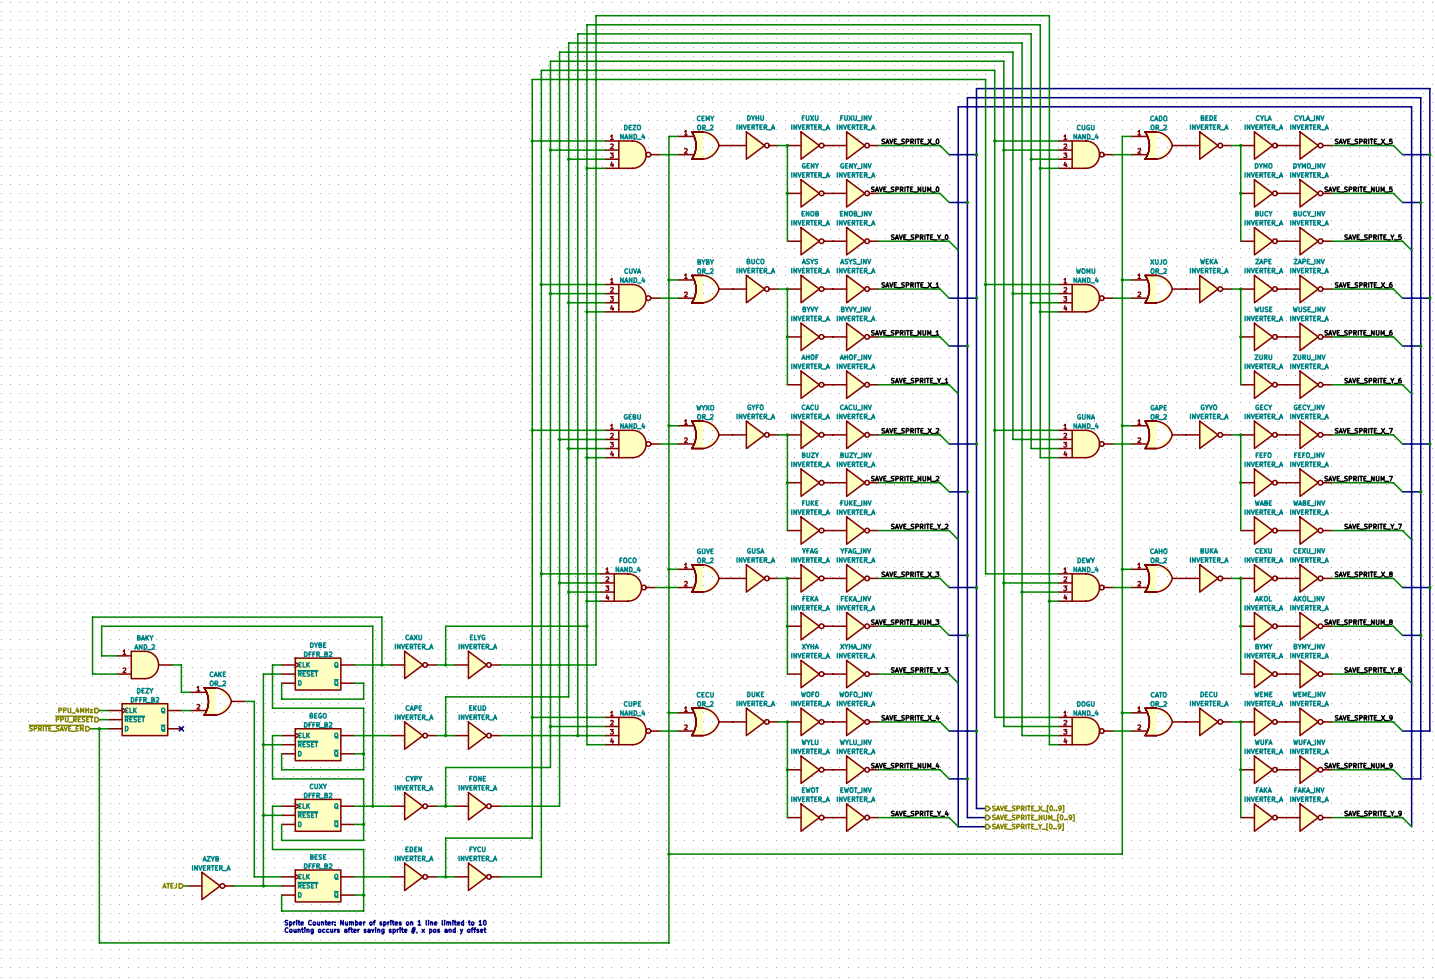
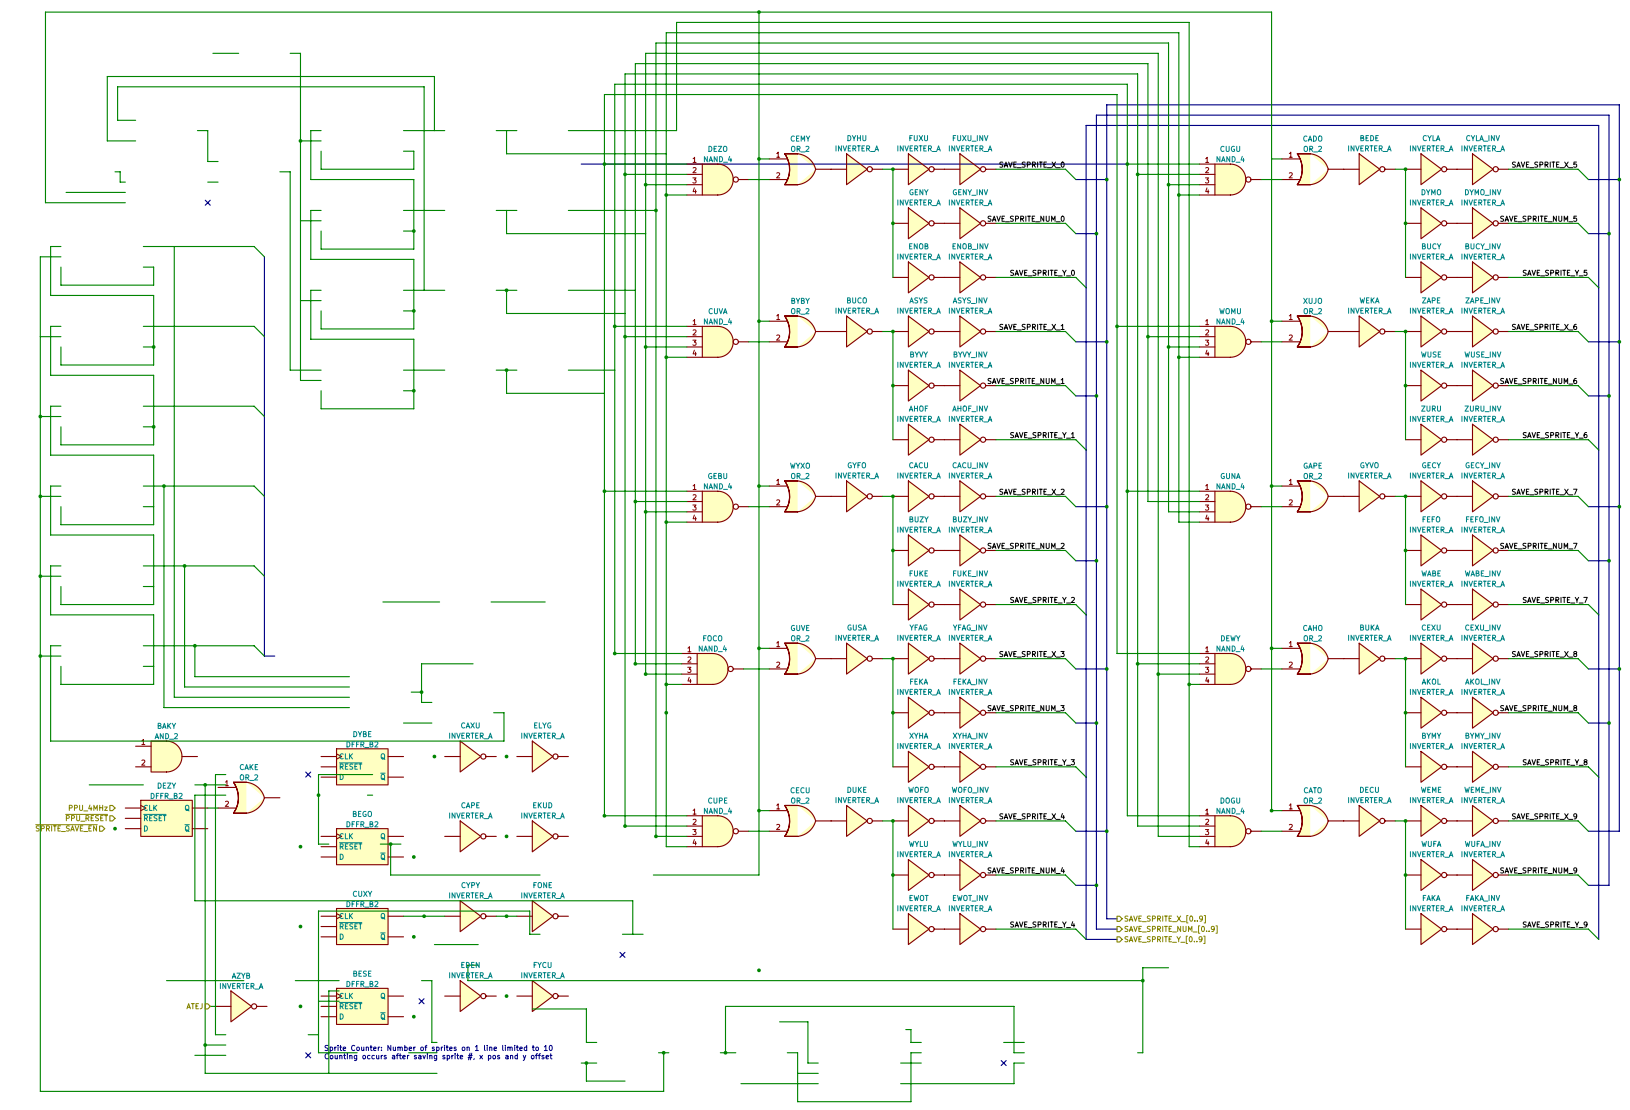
wire: none -> (758, 12) (758, 158)
junction: none -> (758, 12)
wire: none -> (212, 53) (238, 53)
wire: none -> (290, 53) (300, 53) (300, 380) (321, 380)
wire: none -> (135, 120) (117, 120) (117, 86) (424, 86) (424, 290)
wire: none -> (197, 130) (207, 130) (207, 161) (218, 161)
wire: none -> (321, 130) (310, 130) (310, 179) (413, 179) (413, 249) (321, 249) (321, 231)
wire: none -> (403, 130) (444, 130)
wire: none -> (434, 130) (434, 76) (107, 76) (107, 140) (135, 140)
wire: none -> (496, 130) (516, 130)
wire: none -> (506, 130) (506, 153) (666, 153)
wire: (596, 111) (596, 664) (500, 664) -> (676, 130) (568, 130)
wire: none -> (300, 140) (321, 140)
junction: none -> (300, 140)
wire: none -> (321, 151) (321, 169) (413, 169) (413, 151) (403, 151)
junction: none -> (758, 158)
wire: none -> (1271, 158) (1271, 12) (45, 12) (45, 202) (125, 202)
line: none -> (581, 164) (1127, 164)
wire: none -> (115, 171) (120, 171) (120, 182) (125, 182)
wire: none -> (279, 171) (290, 171) (290, 370) (321, 370)
wire: none -> (207, 182) (218, 182)
wire: none -> (66, 192) (125, 192)
no-connect mark: none -> (207, 202)
wire: none -> (321, 210) (310, 210) (310, 259) (413, 259) (413, 328) (321, 328) (321, 310)
wire: none -> (403, 210) (444, 210)
wire: none -> (496, 210) (516, 210)
wire: none -> (506, 210) (506, 233) (645, 233)
wire: none -> (568, 210) (655, 210)
junction: none -> (655, 210)
wire: none -> (300, 220) (321, 220)
wire: none -> (403, 231) (413, 231)
junction: none -> (413, 231)
wire: none -> (60, 246) (50, 246) (50, 295) (153, 295) (153, 365) (60, 365) (60, 346)
wire: none -> (143, 246) (254, 246) (264, 256)
wire: none -> (174, 246) (174, 697) (349, 697)
wire: none -> (60, 256) (40, 256) (40, 1091) (663, 1091) (663, 1052)
bus: none -> (264, 256) (264, 656) (274, 656)
wire: none -> (60, 267) (60, 285) (153, 285) (153, 267) (143, 267)
wire: none -> (321, 290) (310, 290) (310, 339) (413, 339) (413, 408) (321, 408) (321, 390)
wire: none -> (403, 290) (444, 290)
wire: none -> (496, 290) (516, 290)
wire: none -> (506, 290) (506, 313) (625, 313)
junction: none -> (506, 290)
wire: none -> (568, 290) (635, 290)
wire: none -> (300, 300) (321, 300)
wire: none -> (403, 310) (413, 310)
junction: none -> (413, 310)
wire: none -> (60, 326) (50, 326) (50, 375) (153, 375) (153, 444) (60, 444) (60, 426)
wire: none -> (143, 326) (254, 326) (264, 336)
wire: none -> (40, 336) (60, 336)
wire: none -> (143, 346) (153, 346)
junction: none -> (153, 346)
wire: none -> (403, 370) (444, 370)
wire: none -> (496, 370) (516, 370)
wire: none -> (506, 370) (506, 393) (604, 393)
junction: none -> (506, 370)
wire: none -> (568, 370) (614, 370)
wire: none -> (403, 390) (413, 390)
junction: none -> (413, 390)
wire: none -> (60, 406) (50, 406) (50, 455) (153, 455) (153, 524) (60, 524) (60, 506)
wire: none -> (143, 406) (254, 406) (264, 416)
wire: none -> (40, 416) (60, 416)
junction: none -> (40, 416)
wire: none -> (143, 426) (153, 426)
junction: none -> (153, 426)
wire: none -> (60, 486) (50, 486) (50, 535) (153, 535) (153, 604) (60, 604) (60, 586)
wire: none -> (143, 486) (254, 486) (264, 496)
wire: none -> (163, 486) (163, 707) (349, 707)
junction: none -> (163, 486)
wire: none -> (40, 496) (60, 496)
junction: none -> (40, 496)
wire: none -> (143, 506) (153, 506)
wire: none -> (60, 565) (50, 565) (50, 614) (153, 614) (153, 684) (60, 684) (60, 666)
wire: none -> (143, 565) (254, 565) (264, 576)
wire: none -> (184, 565) (184, 686) (349, 686)
junction: none -> (184, 565)
wire: none -> (40, 576) (60, 576)
junction: none -> (40, 576)
wire: none -> (143, 586) (153, 586)
wire: none -> (382, 601) (439, 601)
wire: none -> (491, 601) (545, 601)
wire: none -> (60, 645) (50, 645) (50, 741) (503, 741) (503, 712) (493, 712)
wire: none -> (143, 645) (254, 645) (264, 656)
wire: none -> (194, 645) (194, 676) (349, 676)
junction: none -> (194, 645)
wire: (541, 573) (541, 876) (500, 876) -> none
wire: none -> (40, 656) (60, 656)
junction: none -> (40, 656)
wire: (559, 582) (559, 806) (500, 806) -> none
wire: none -> (143, 666) (153, 666)
wire: (568, 592) (568, 696) (445, 696) (445, 735) -> none
wire: none -> (411, 692) (421, 692)
junction: none -> (421, 692)
wire: (370, 617) (92, 617) (92, 674) (117, 674) -> (421, 702) (421, 663) (473, 663)
wire: (379, 617) (381, 617) (381, 664) -> none
wire: (586, 626) (445, 626) (445, 664) -> none
wire: none -> (403, 723) (431, 723)
wire: (117, 655) (101, 655) (101, 626) (372, 626) (372, 806) -> none
wire: (172, 664) (181, 664) (181, 692) (190, 692) -> none
wire: (281, 664) (272, 664) (272, 708) (363, 708) (363, 769) -> (540, 875) (413, 875)
wire: (354, 664) (390, 664) -> none
wire: (436, 664) (454, 664) -> none
wire: (281, 674) (263, 674) (263, 885) -> none
wire: none -> (225, 774) (215, 774) (215, 1034) (225, 1034)
no-connect mark: none -> (308, 774)
wire: none -> (372, 774) (318, 774) (318, 844) (328, 844)
wire: (281, 683) (281, 699) (322, 699) -> none
wire: (354, 683) (363, 683) (363, 699) (327, 699) -> none
wire: none -> (89, 784) (143, 784)
wire: none -> (194, 784) (225, 784)
wire: none -> (205, 784) (205, 1073) (437, 1073)
junction: none -> (205, 784)
wire: none -> (225, 795) (194, 795) (194, 900) (632, 900) (632, 934)
junction: none -> (318, 795)
wire: (245, 701) (254, 701) (254, 876) (281, 876) -> none
wire: (99, 710) (108, 710) -> none
wire: (1122, 712) (1122, 854) (668, 854) -> none
wire: (532, 717) (532, 838) (445, 838) (445, 876) -> none
wire: (99, 719) (108, 719) -> none
wire: (550, 726) (550, 767) (445, 767) (445, 806) -> none
wire: (90, 728) (108, 728) -> none
wire: (99, 728) (99, 942) (668, 942) (668, 854) -> none
no-connect mark: (181, 728) -> none
wire: (281, 735) (272, 735) (272, 778) (363, 778) (363, 840) (281, 840) (281, 824) -> none
wire: (354, 735) (390, 735) -> none
wire: (436, 735) (454, 735) -> none
wire: (500, 735) (577, 735) -> none
junction: none -> (390, 844)
wire: (263, 744) (281, 744) -> (380, 844) (400, 844)
wire: (281, 753) (281, 769) (343, 769) -> (390, 844) (390, 875)
wire: (354, 753) (363, 753) -> none
wire: (668, 769) (668, 854) -> (758, 875) (653, 875)
wire: (281, 806) (272, 806) (272, 849) (363, 849) (363, 911) (281, 911) (281, 895) -> none
wire: (263, 815) (281, 815) -> (318, 1001) (339, 1001)
wire: none -> (540, 934) (529, 934) (529, 911) (318, 911) (318, 1052) (357, 1052)
wire: none -> (622, 934) (643, 934)
wire: (354, 824) (363, 824) -> none
wire: none -> (434, 944) (478, 944)
no-connect mark: none -> (622, 954)
wire: none -> (478, 965) (467, 965) (467, 980) (1142, 980)
wire: none -> (1168, 967) (1142, 967) (1142, 1052) (1137, 1052)
wire: none -> (166, 980) (243, 980)
wire: none -> (295, 980) (339, 980)
wire: none -> (421, 980) (431, 980) (431, 1042) (437, 1042)
junction: none -> (1142, 980)
wire: none -> (339, 990) (328, 990) (328, 1073)
wire: (354, 876) (390, 876) -> none
wire: (436, 876) (454, 876) -> none
no-connect mark: none -> (421, 1001)
wire: (233, 885) (281, 885) -> none
wire: none -> (532, 1008) (586, 1008) (586, 1042) (596, 1042)
wire: (354, 895) (363, 895) -> (308, 1034) (318, 1034)
wire: none -> (779, 1021) (807, 1021) (807, 1063) (818, 1063)
wire: none -> (905, 1029) (910, 1029) (910, 1042) (921, 1042)
wire: none -> (1003, 1042) (1024, 1042)
wire: none -> (205, 1045) (225, 1045)
junction: none -> (205, 1045)
wire: none -> (408, 1052) (437, 1052)
wire: none -> (658, 1052) (668, 1052)
junction: none -> (663, 1052)
wire: none -> (720, 1052) (735, 1052)
wire: none -> (725, 1052) (725, 1006) (1013, 1006) (1013, 1052) (1024, 1052)
junction: none -> (725, 1052)
wire: none -> (787, 1052) (797, 1052) (797, 1101) (910, 1101) (910, 1052) (921, 1052)
wire: none -> (194, 1055) (225, 1055)
no-connect mark: none -> (308, 1055)
wire: none -> (581, 1063) (596, 1063)
wire: none -> (586, 1063) (586, 1081) (625, 1081)
junction: none -> (586, 1063)
wire: none -> (900, 1063) (921, 1063)
no-connect mark: none -> (1003, 1063)
wire: none -> (1024, 1063) (1013, 1063) (1013, 1083) (900, 1083)
wire: none -> (797, 1073) (818, 1073)
wire: none -> (740, 1083) (818, 1083)

